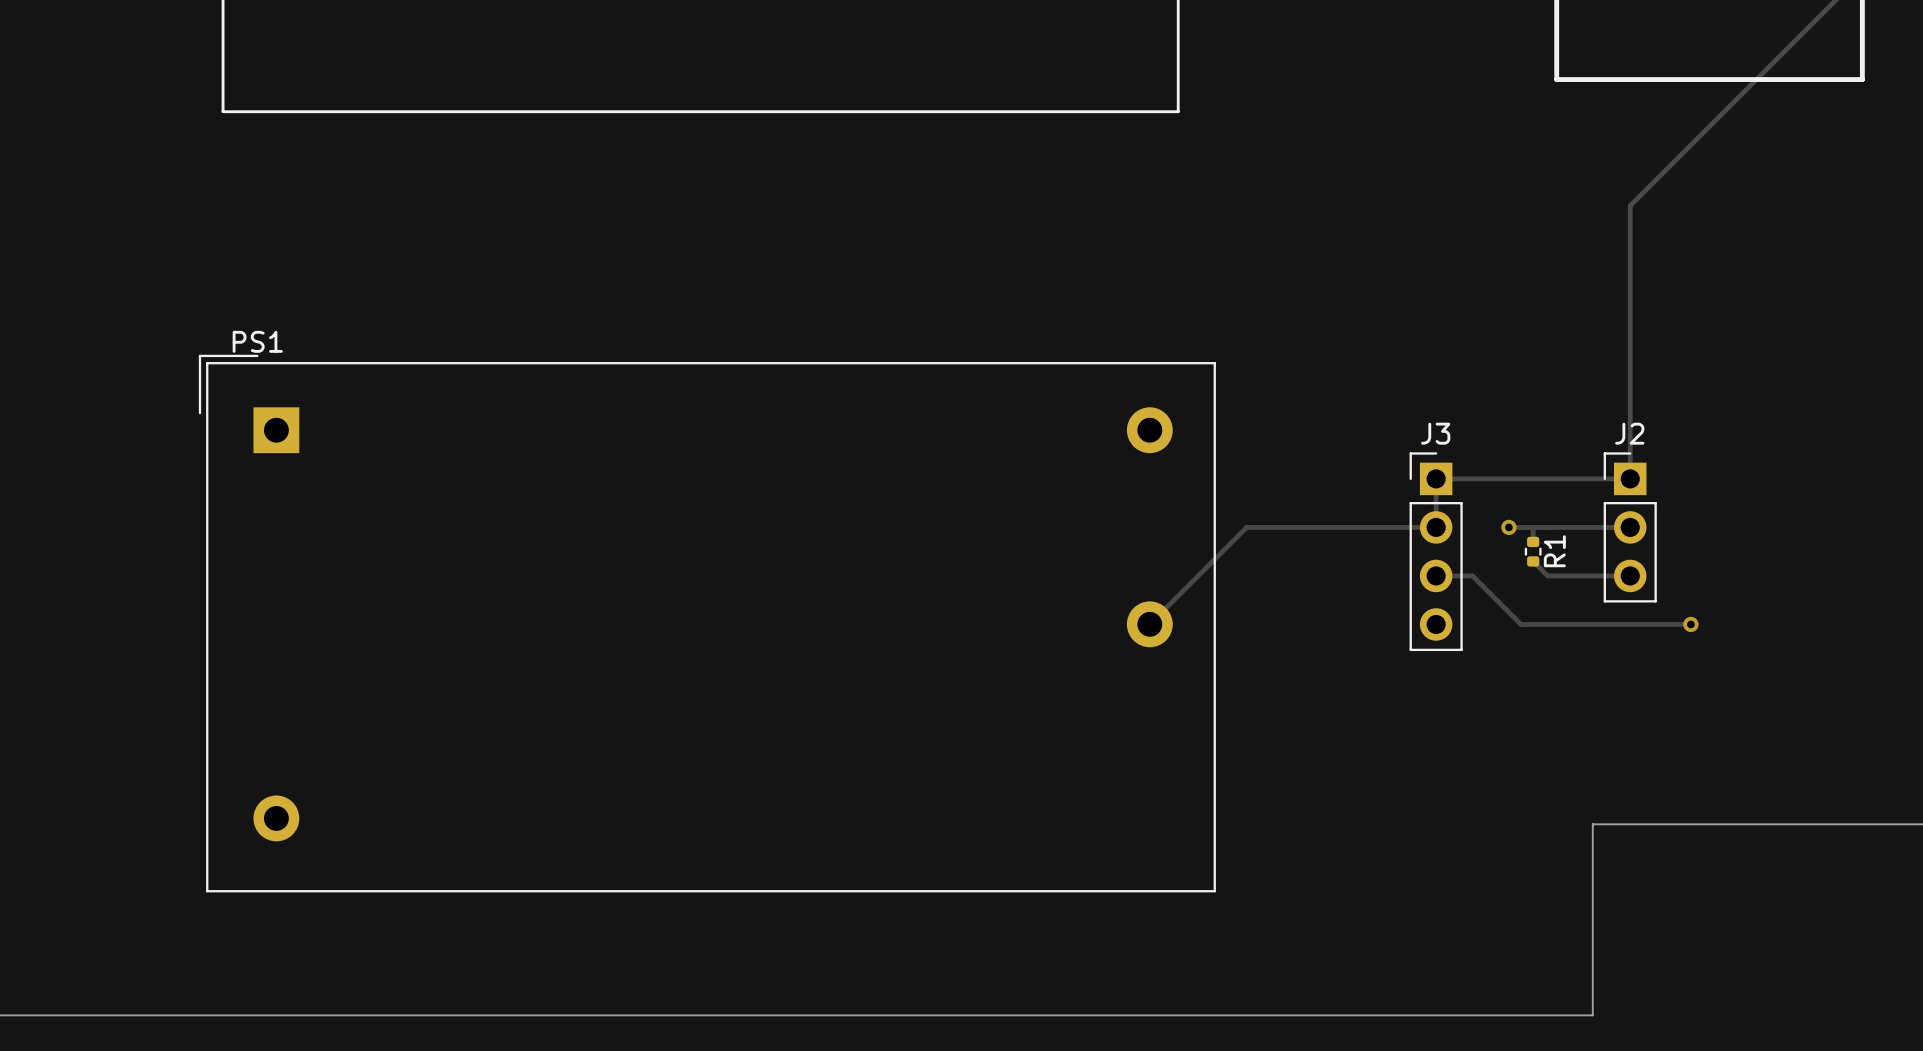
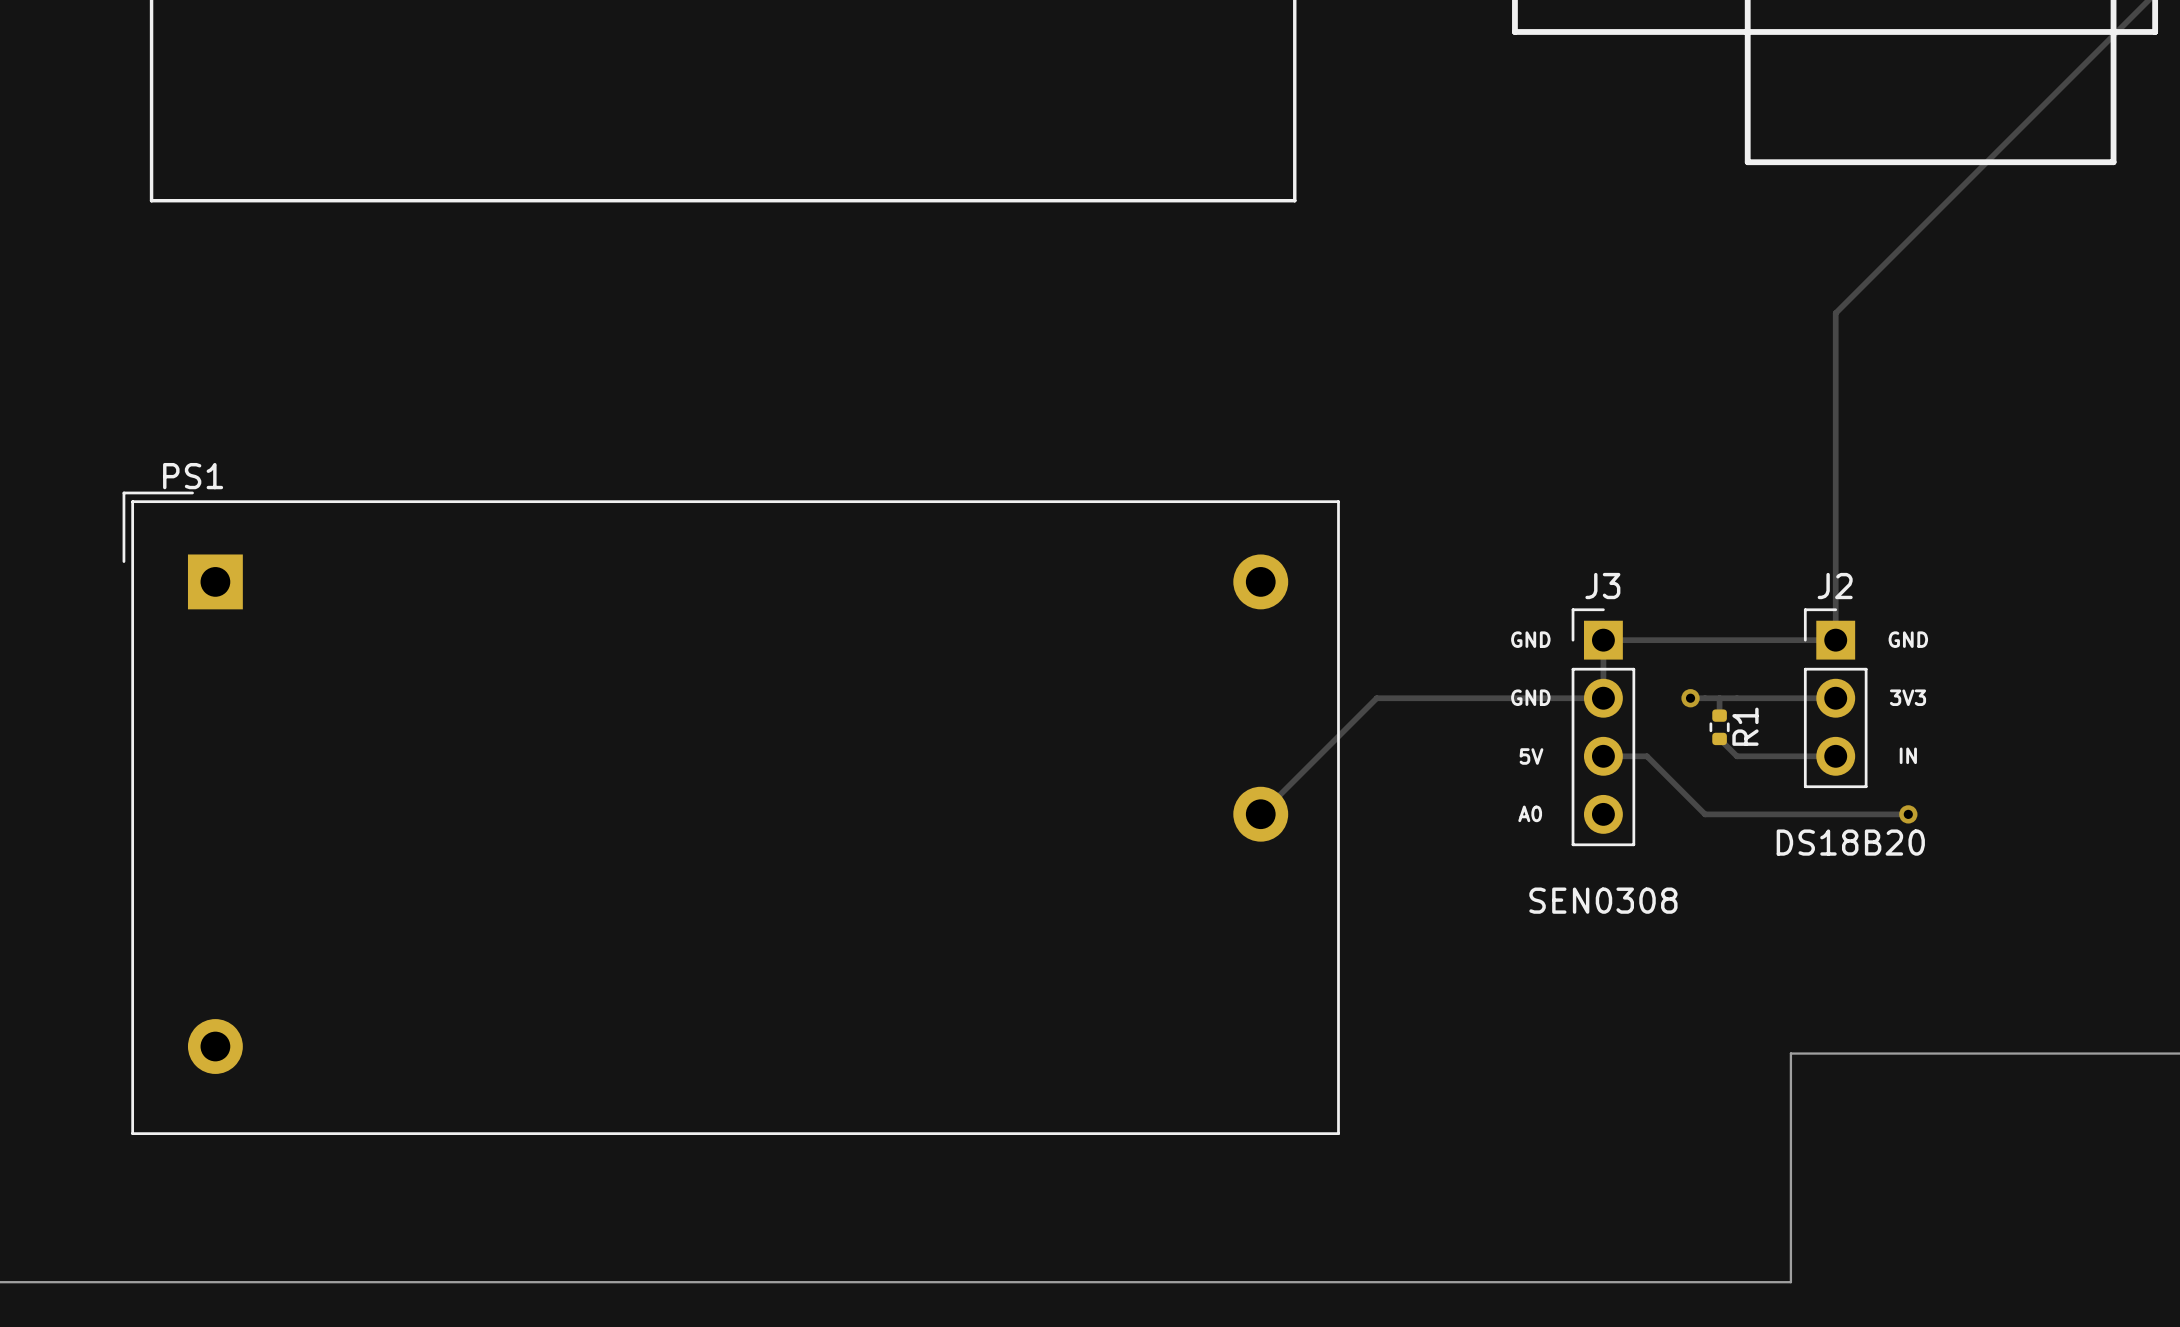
text: none -> GND (1530, 639)
text: none -> GND (1908, 639)
text: none -> GND (1530, 697)
text: none -> 3V3 (1907, 697)
text: none -> IN (1908, 755)
text: none -> 5V (1531, 756)
text: none -> A0 (1530, 813)
text: none -> DS18B20 (1850, 842)
text: none -> SEN0308 (1603, 900)

